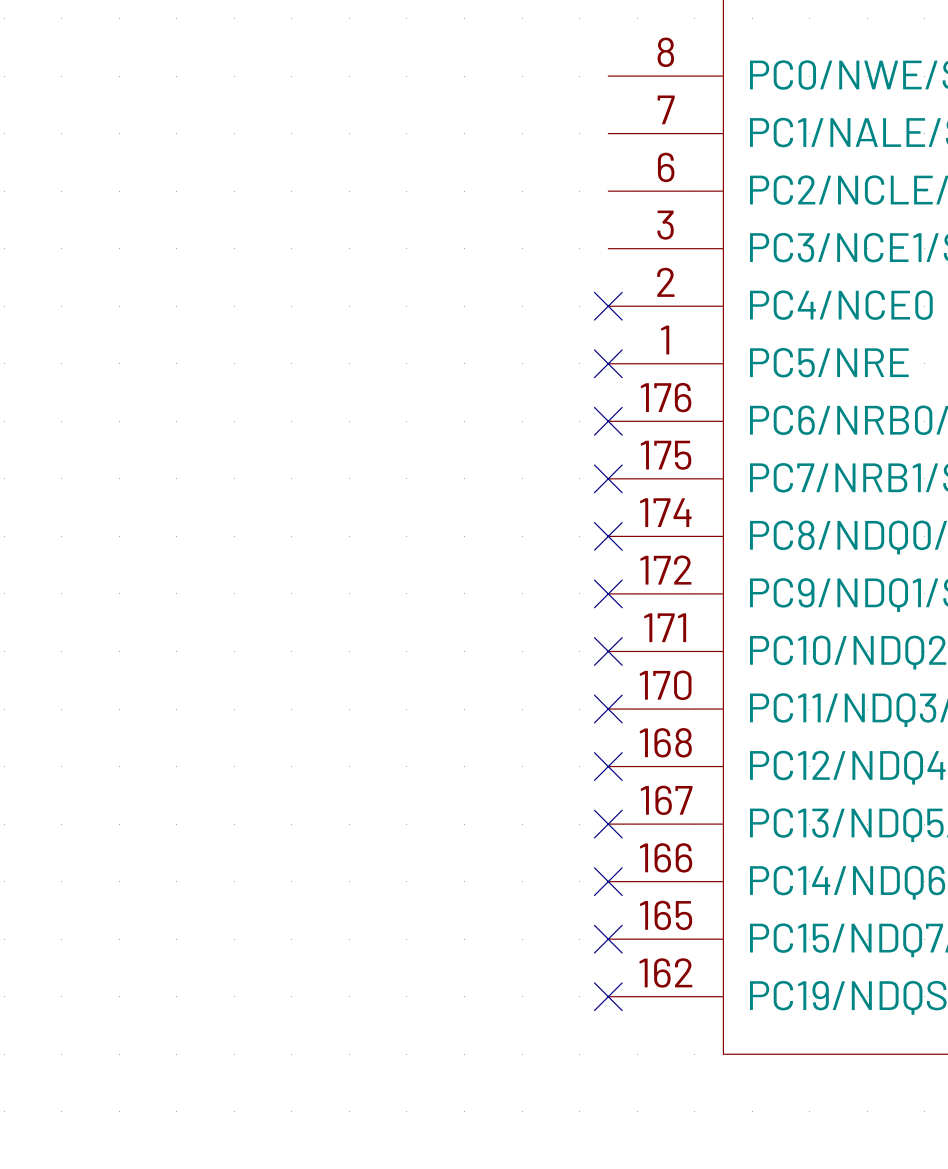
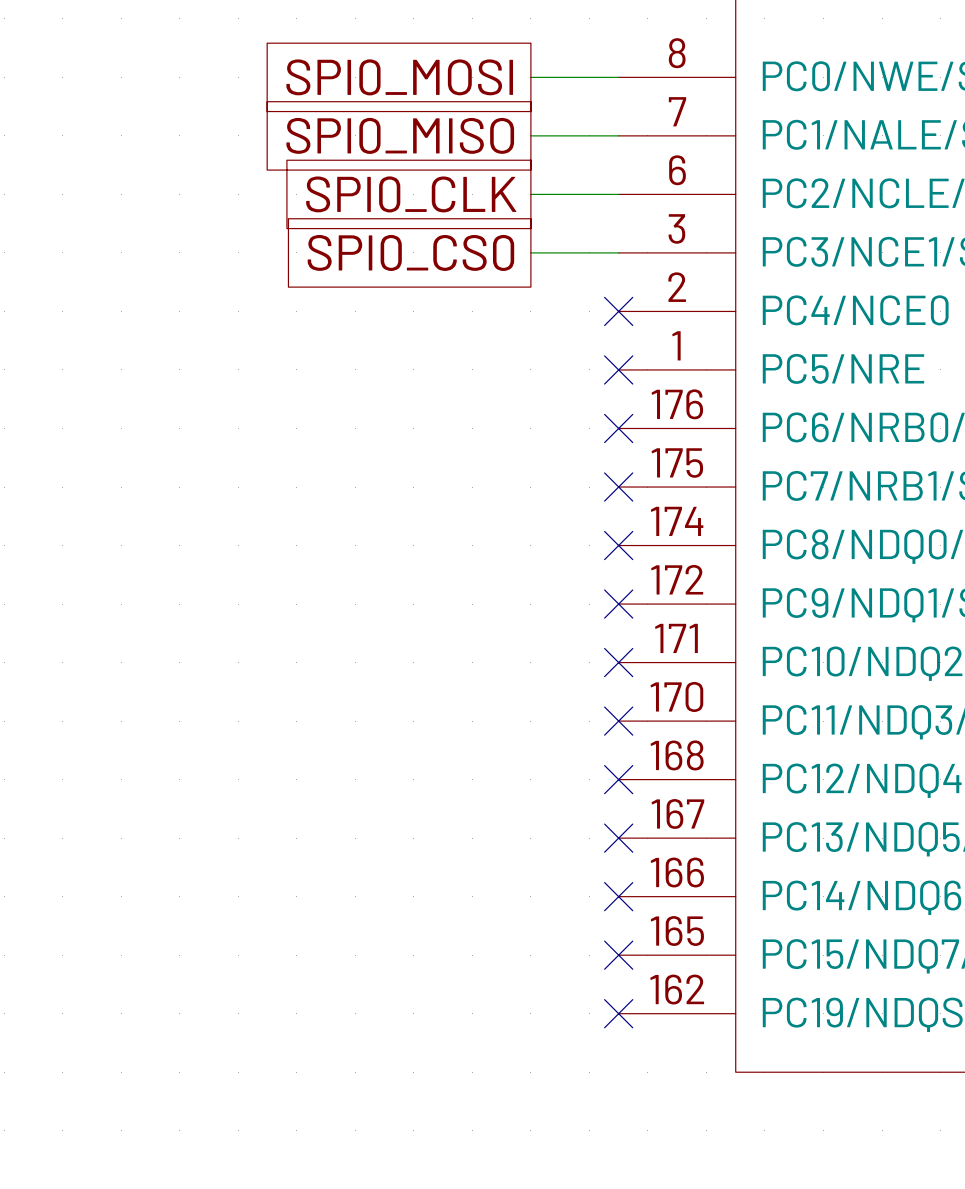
global label: none -> SPI0_MOSI (399, 77)
wire: none -> (530, 77) (618, 77)
global label: none -> SPI0_MISO (400, 135)
wire: none -> (530, 135) (618, 135)
global label: none -> SPI0_CLK (411, 194)
wire: none -> (530, 194) (618, 194)
global label: none -> SPI0_CS0 (410, 252)
wire: none -> (530, 252) (618, 252)

